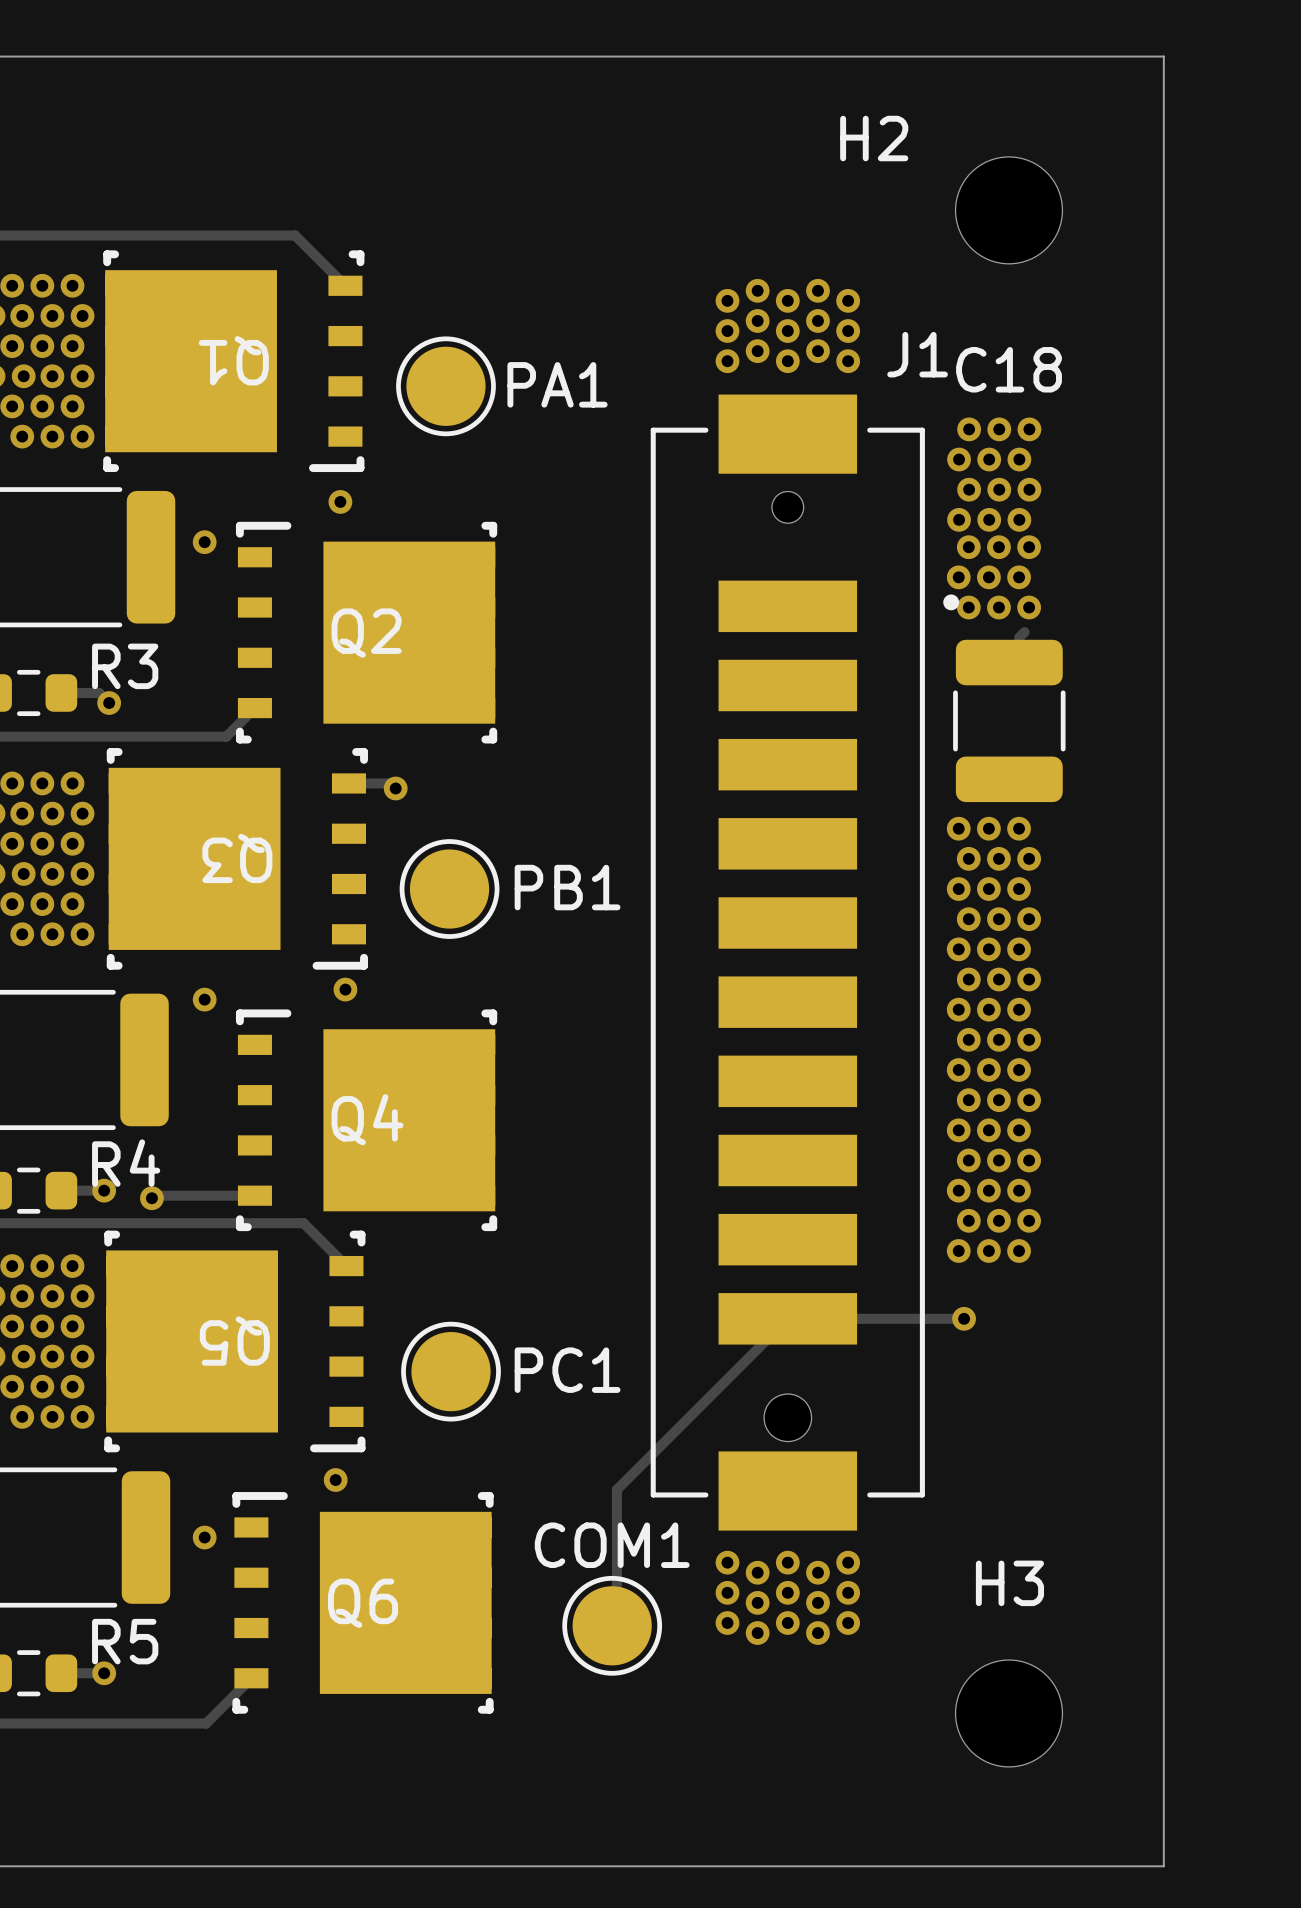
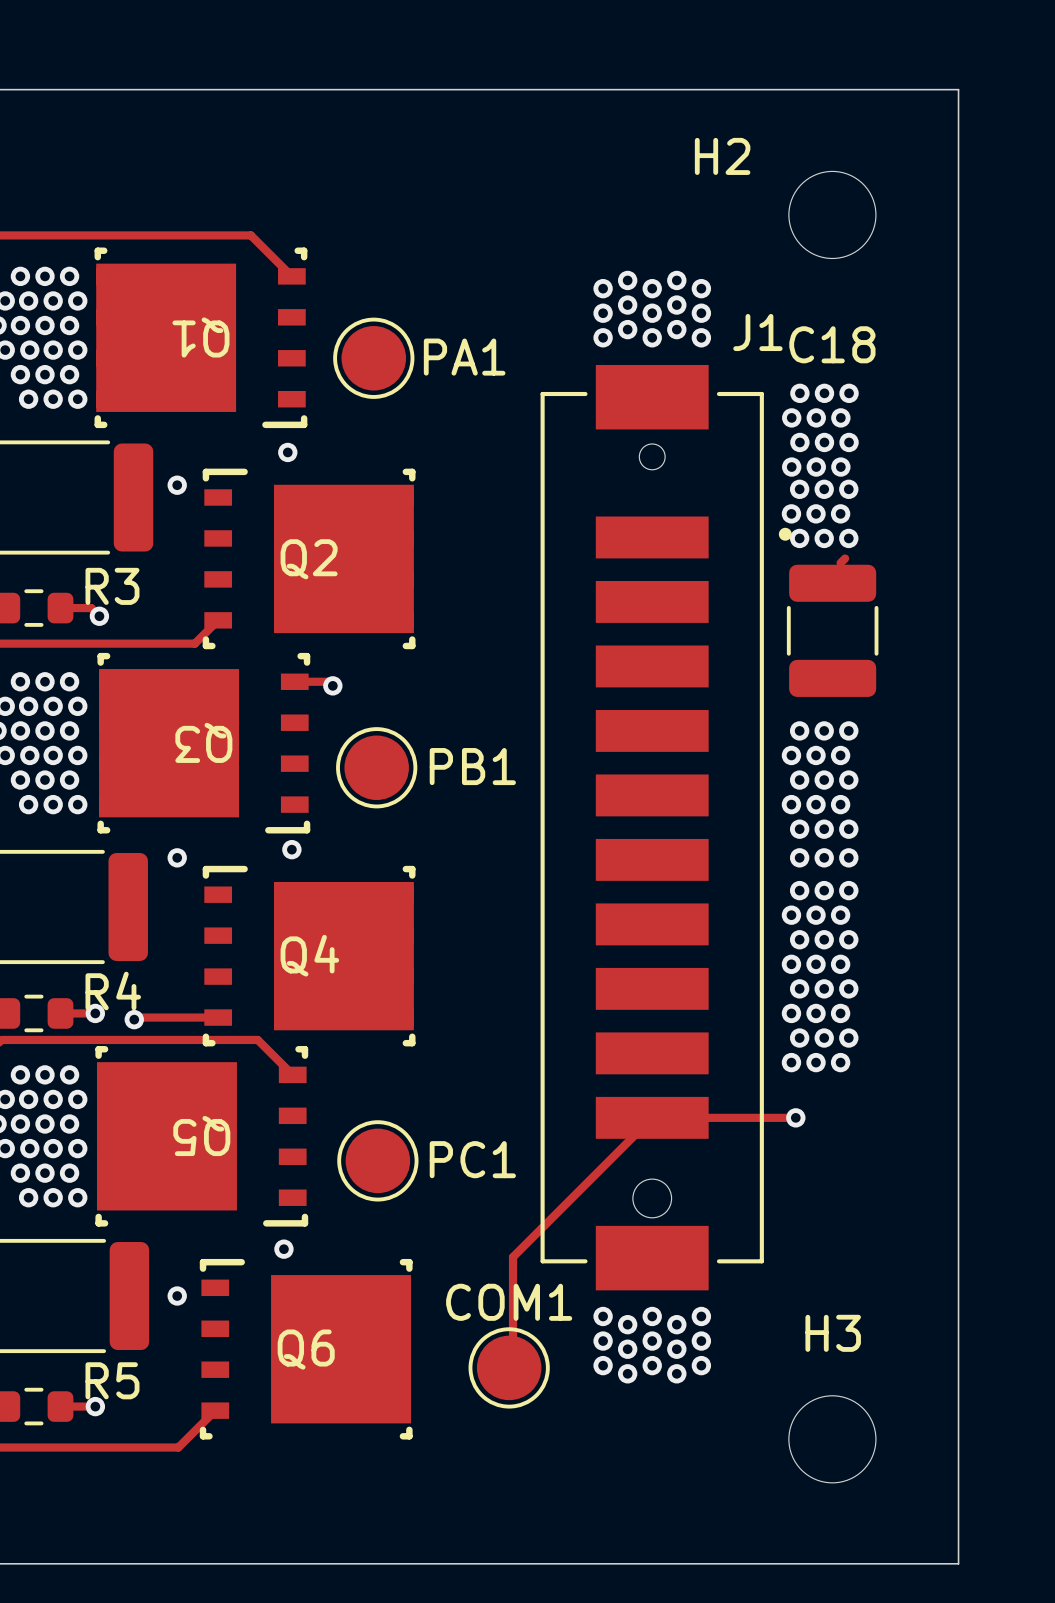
via: (958, 828) -> none
via: (988, 828) -> none
via: (1019, 828) -> none
via: none -> (799, 730)
via: none -> (824, 730)
via: none -> (848, 730)
via: (968, 858) -> none
via: (998, 858) -> none
via: (1029, 858) -> none
via: none -> (791, 755)
via: none -> (816, 755)
via: none -> (840, 755)
via: (958, 889) -> none
via: (988, 889) -> none
via: (1019, 889) -> none
via: none -> (799, 780)
via: none -> (824, 780)
via: none -> (848, 780)
via: (968, 919) -> none
via: (998, 919) -> none
via: (1029, 919) -> none
via: none -> (791, 804)
via: none -> (816, 804)
via: none -> (840, 804)
via: (958, 949) -> none
via: (988, 949) -> none
via: (1019, 949) -> none
via: none -> (799, 829)
via: none -> (824, 829)
via: none -> (848, 829)
via: (968, 979) -> none
via: (998, 979) -> none
via: (1029, 979) -> none
via: none -> (799, 857)
via: none -> (824, 857)
via: none -> (848, 857)
via: (958, 1009) -> none
via: (988, 1009) -> none
via: (1019, 1009) -> none

